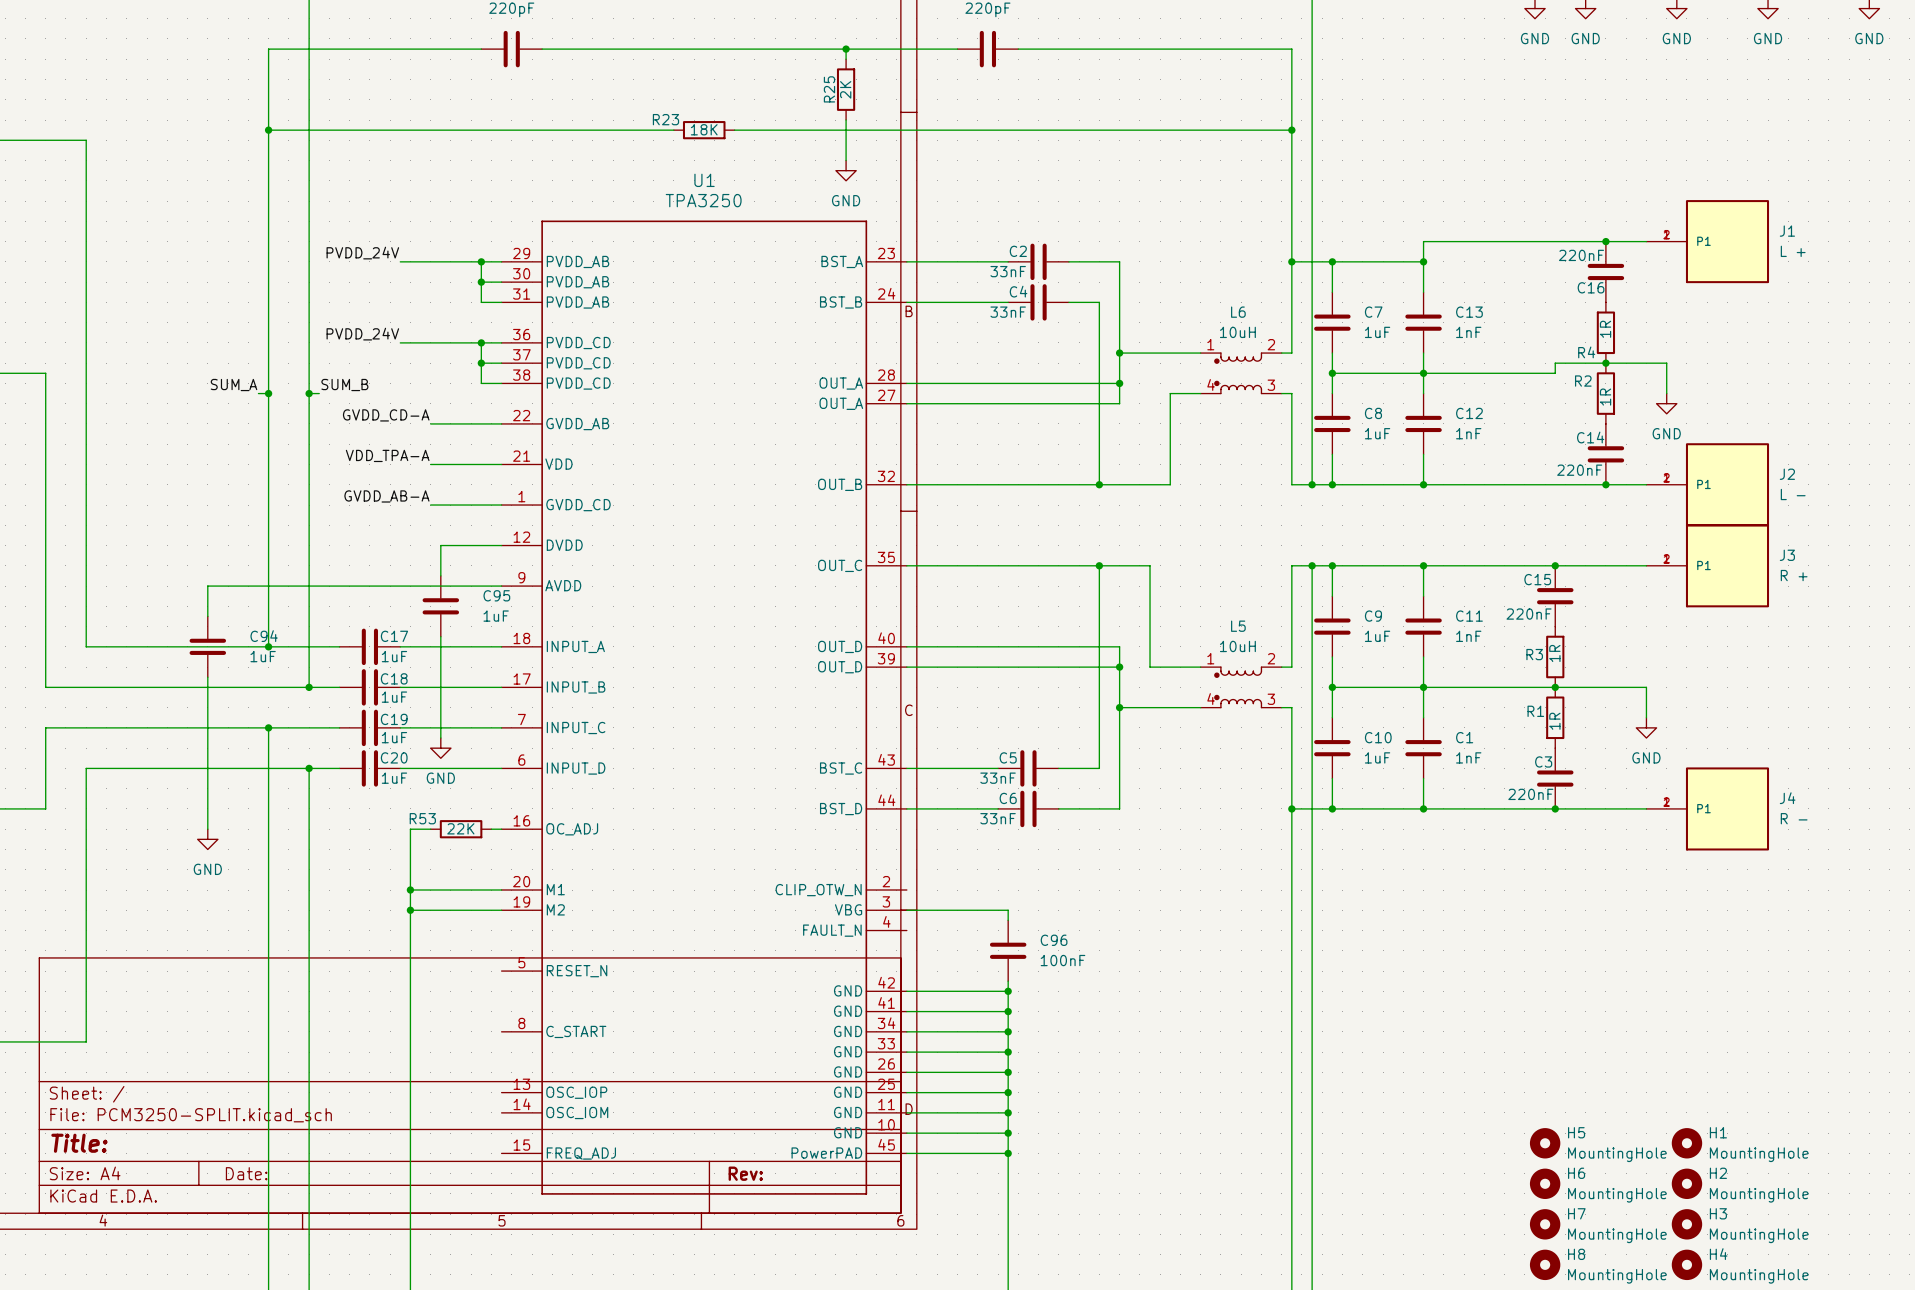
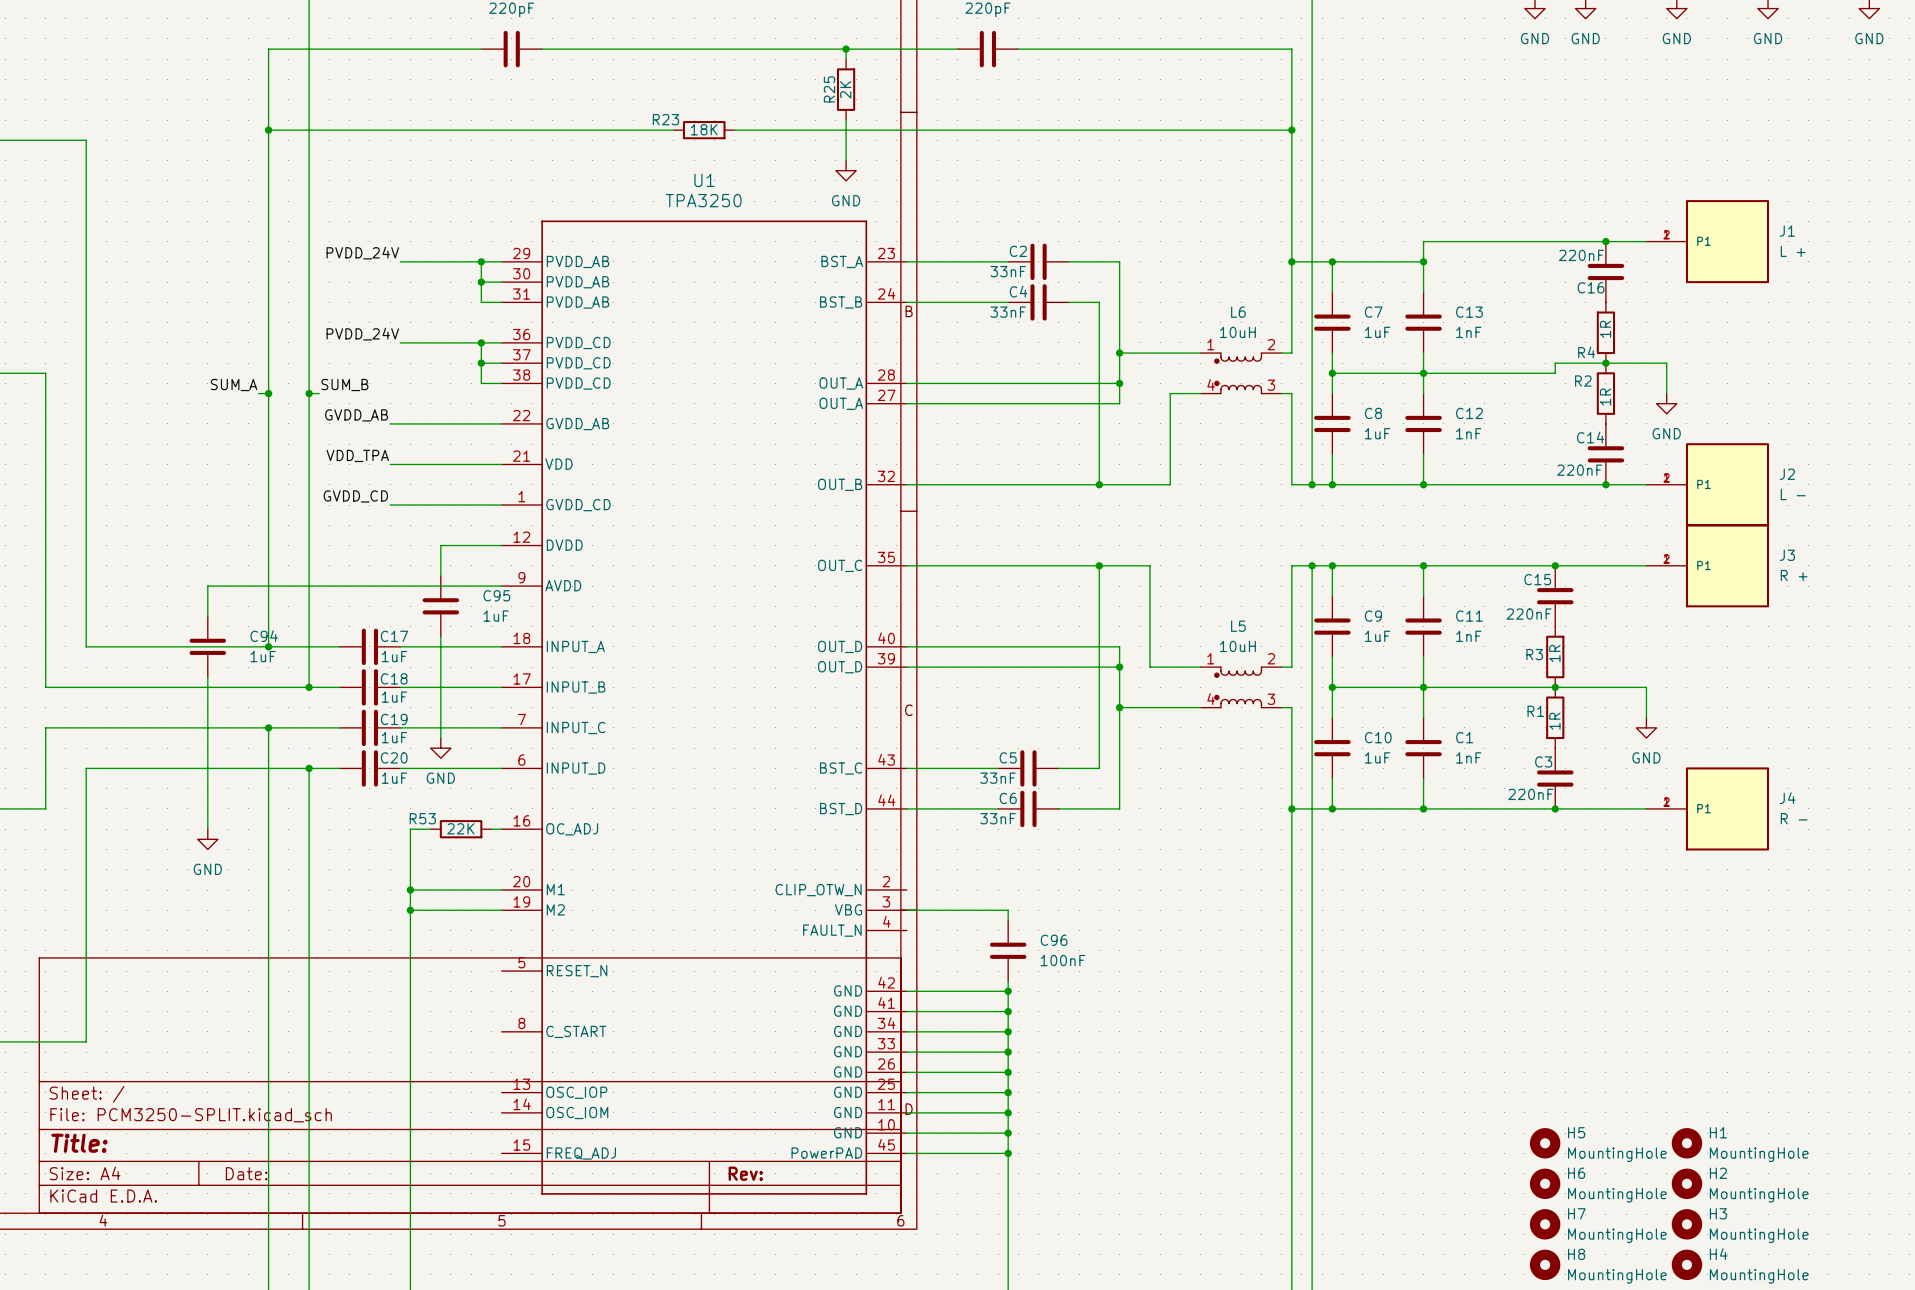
label: GVDD_CD-A (386, 415) -> GVDD_AB (356, 415)
wire: none -> (390, 423) (430, 423)
label: VDD_TPA-A (387, 455) -> VDD_TPA (357, 455)
wire: none -> (390, 464) (430, 464)
label: GVDD_AB-A (386, 496) -> GVDD_CD (355, 496)
wire: none -> (390, 505) (430, 505)

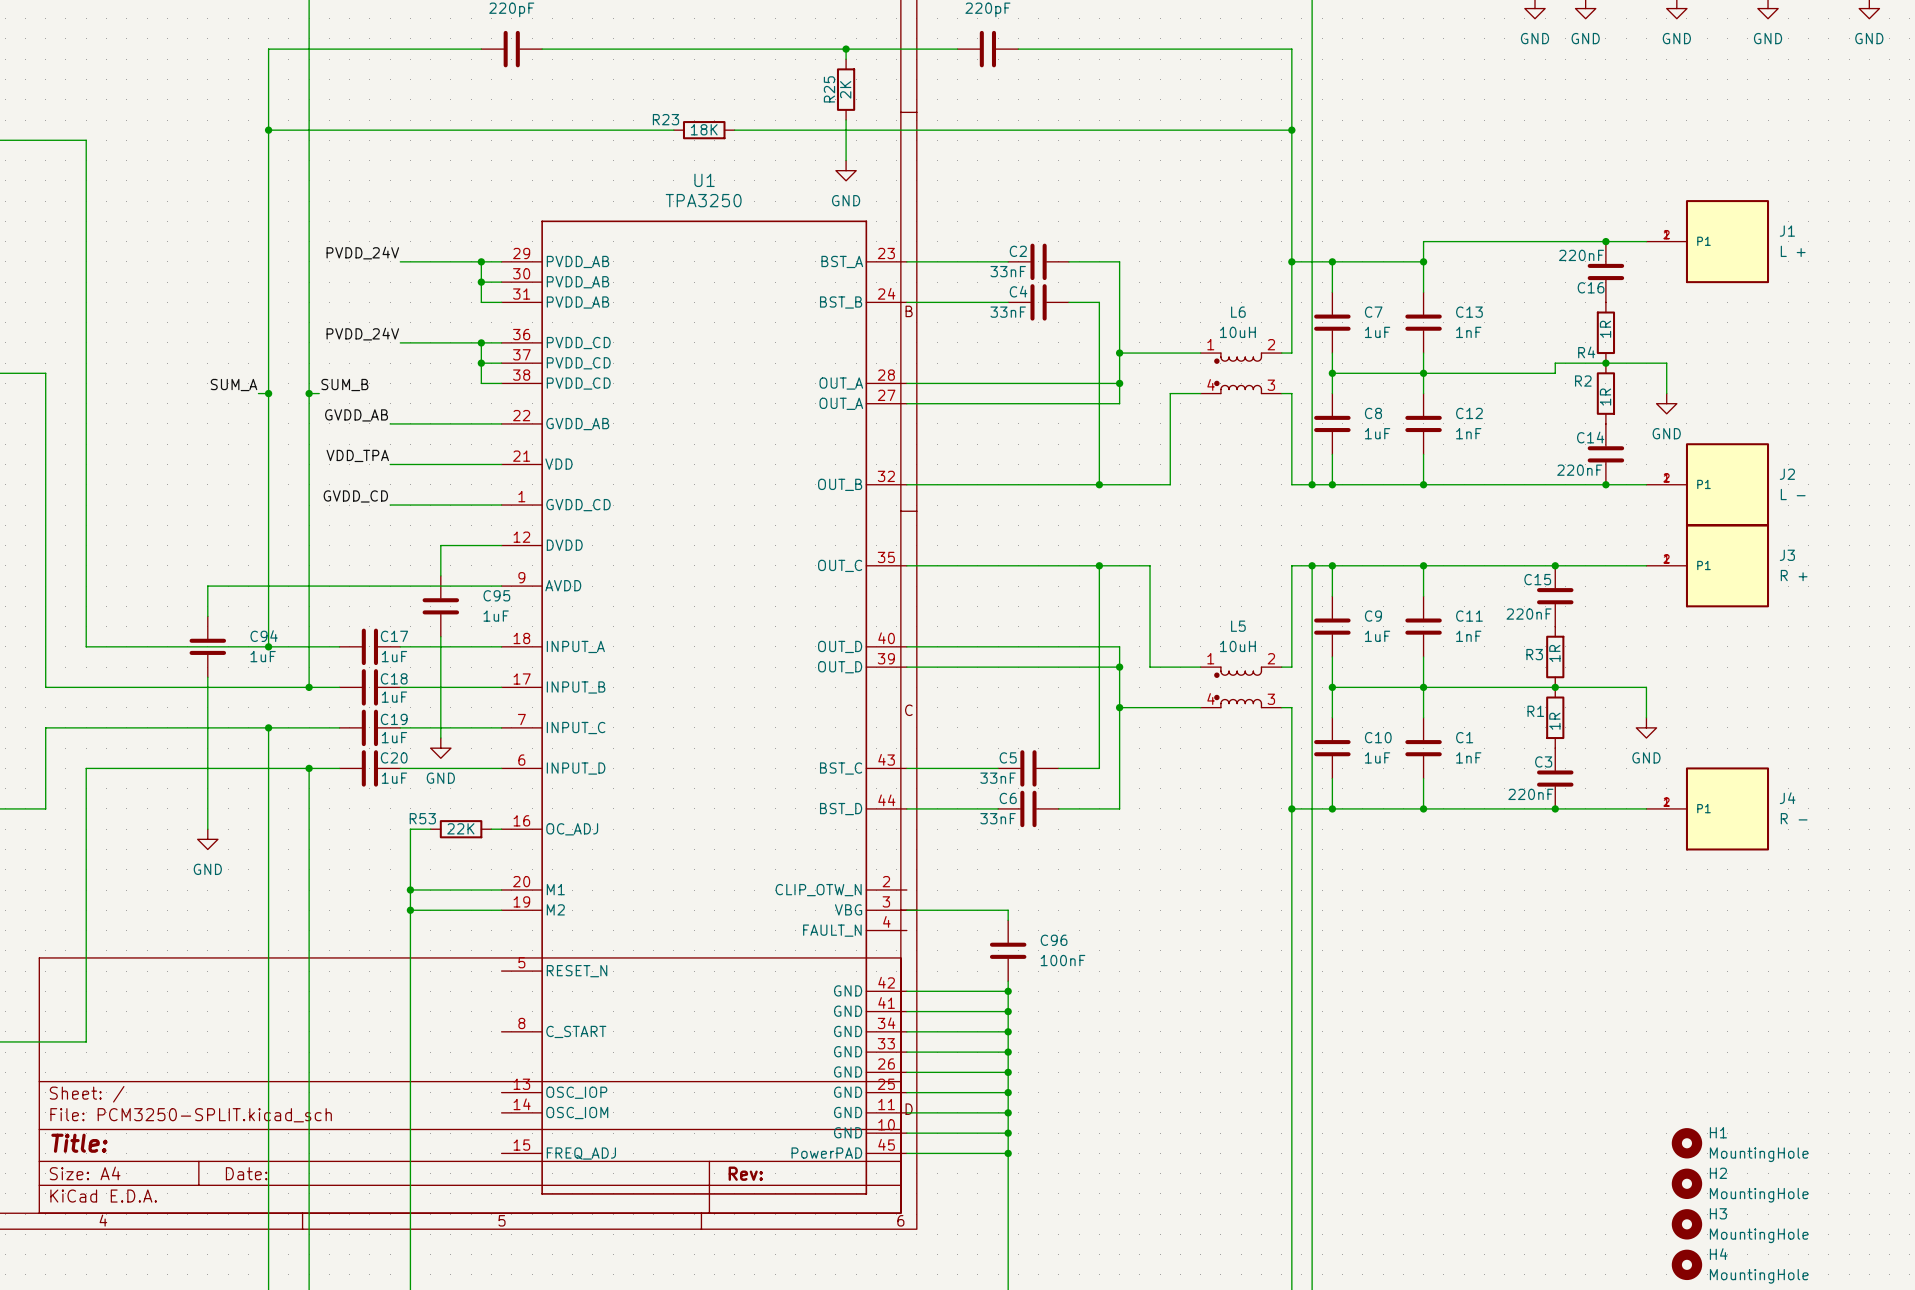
H5: MountingHole (1545, 1143) -> none
H6: MountingHole (1545, 1183) -> none
H7: MountingHole (1545, 1224) -> none
H8: MountingHole (1545, 1264) -> none

